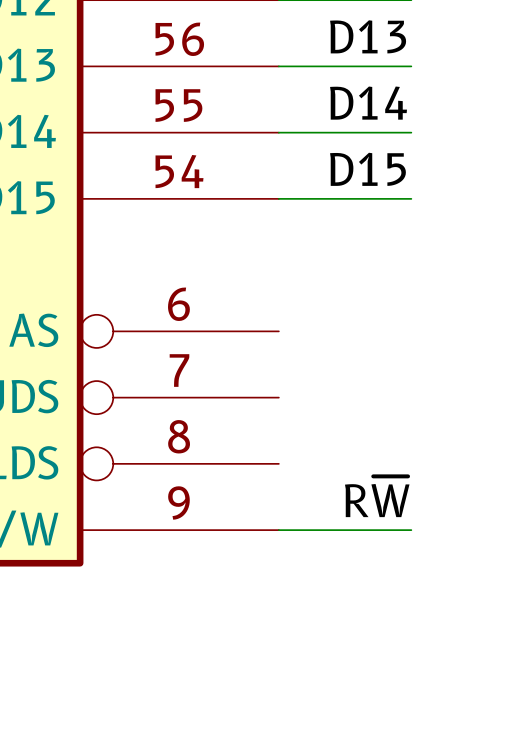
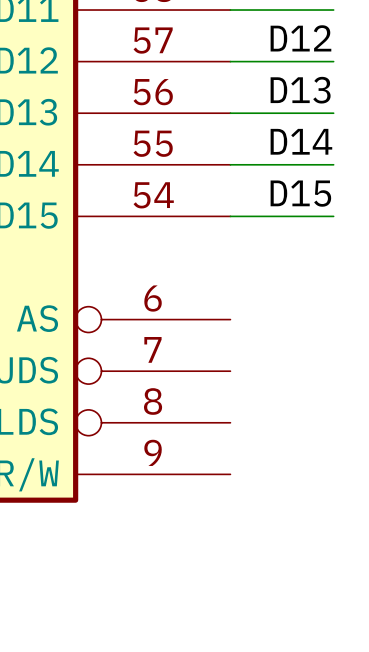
label: R~{W} (377, 496) -> none
wire: (278, 530) (411, 530) -> none

